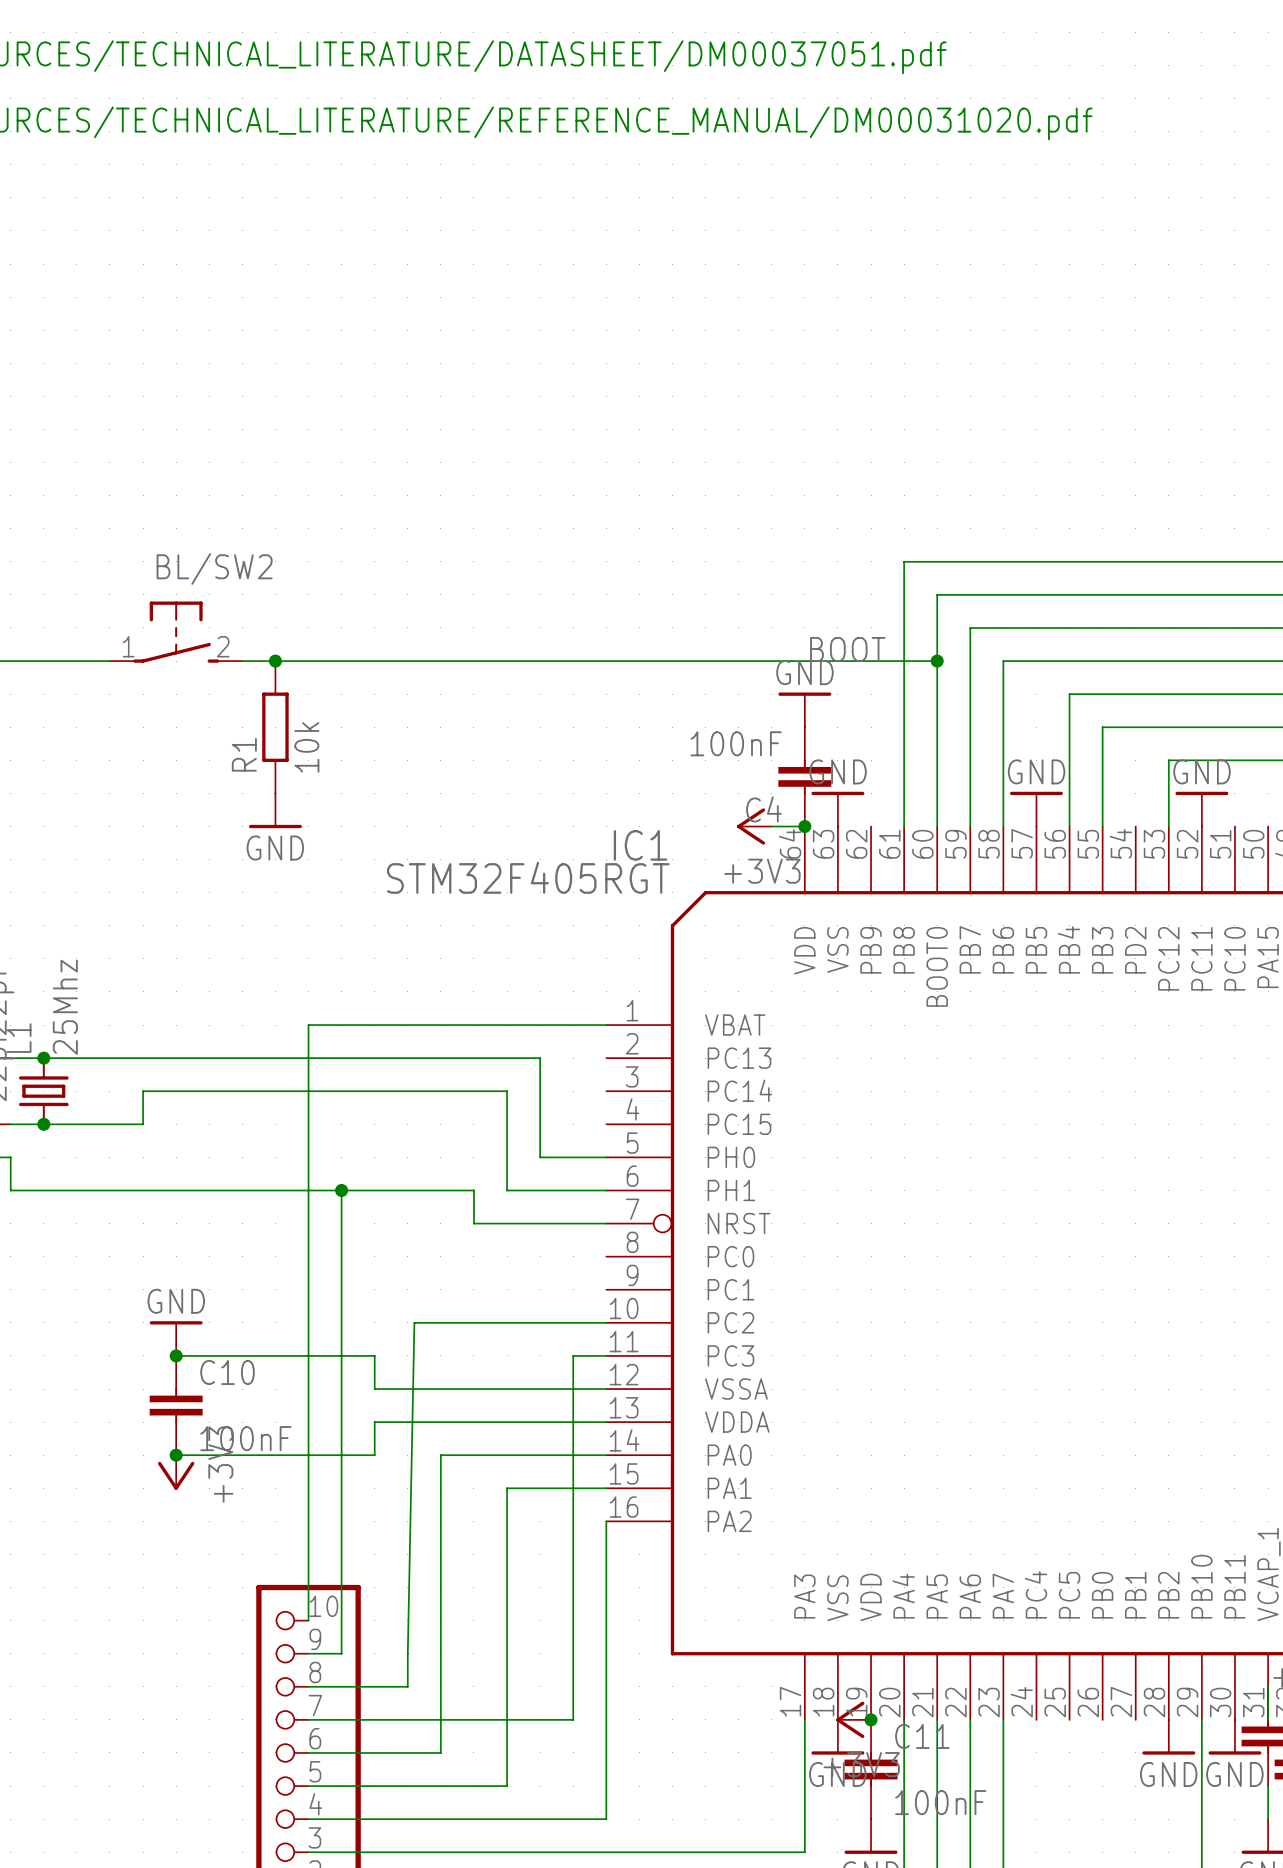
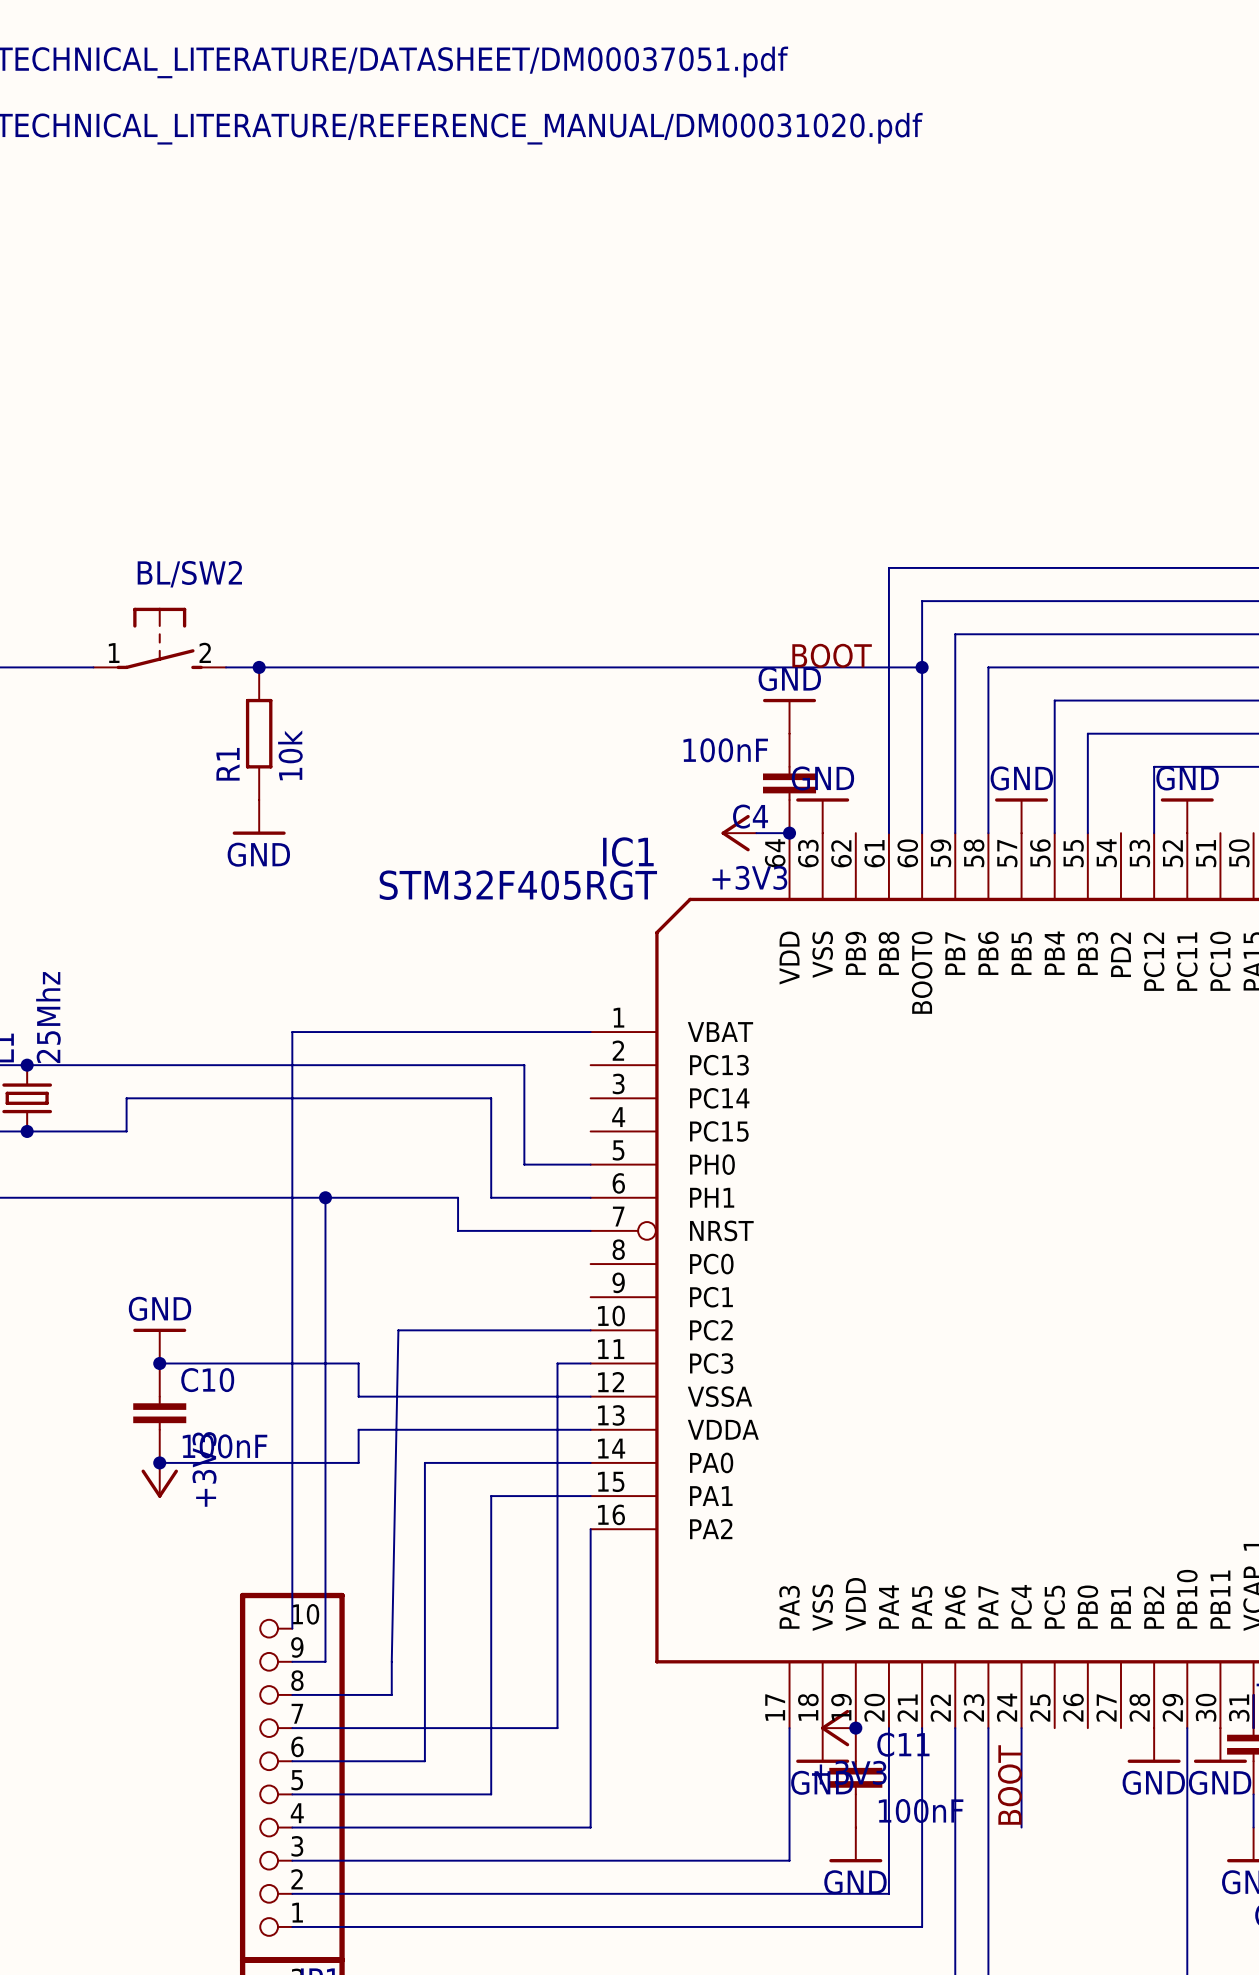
wire: none -> (1021, 1728) (1021, 1827)
label: none -> BOOT (1009, 1784)

